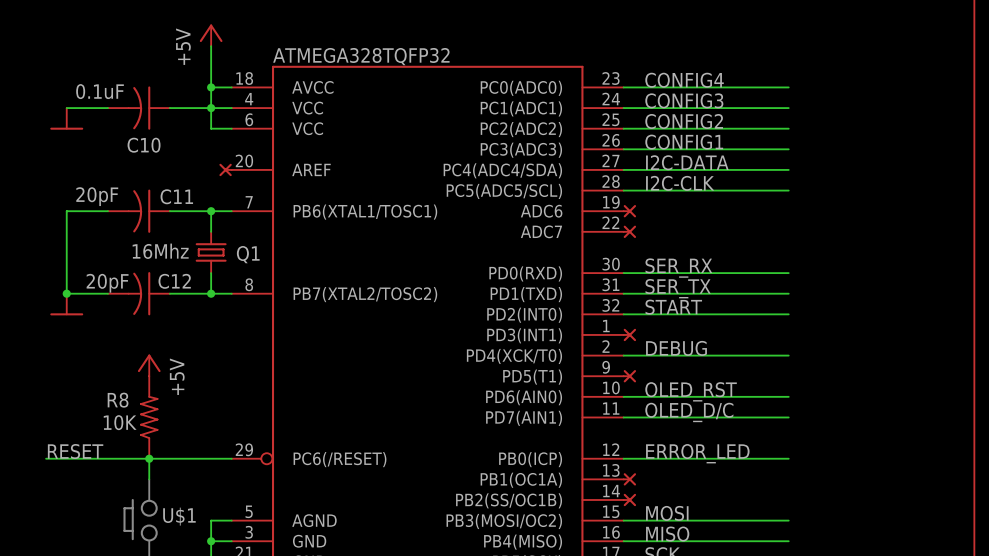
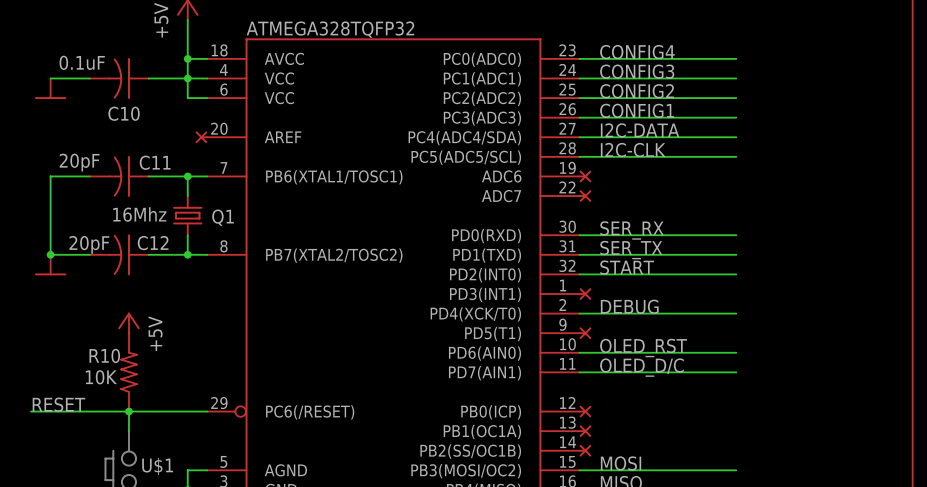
R8 name: R8 (118, 400) -> R10 (104, 355)
label: ERROR_LED (697, 453) -> none
wire: (623, 458) (788, 458) -> none
part: none -> (585, 411)

